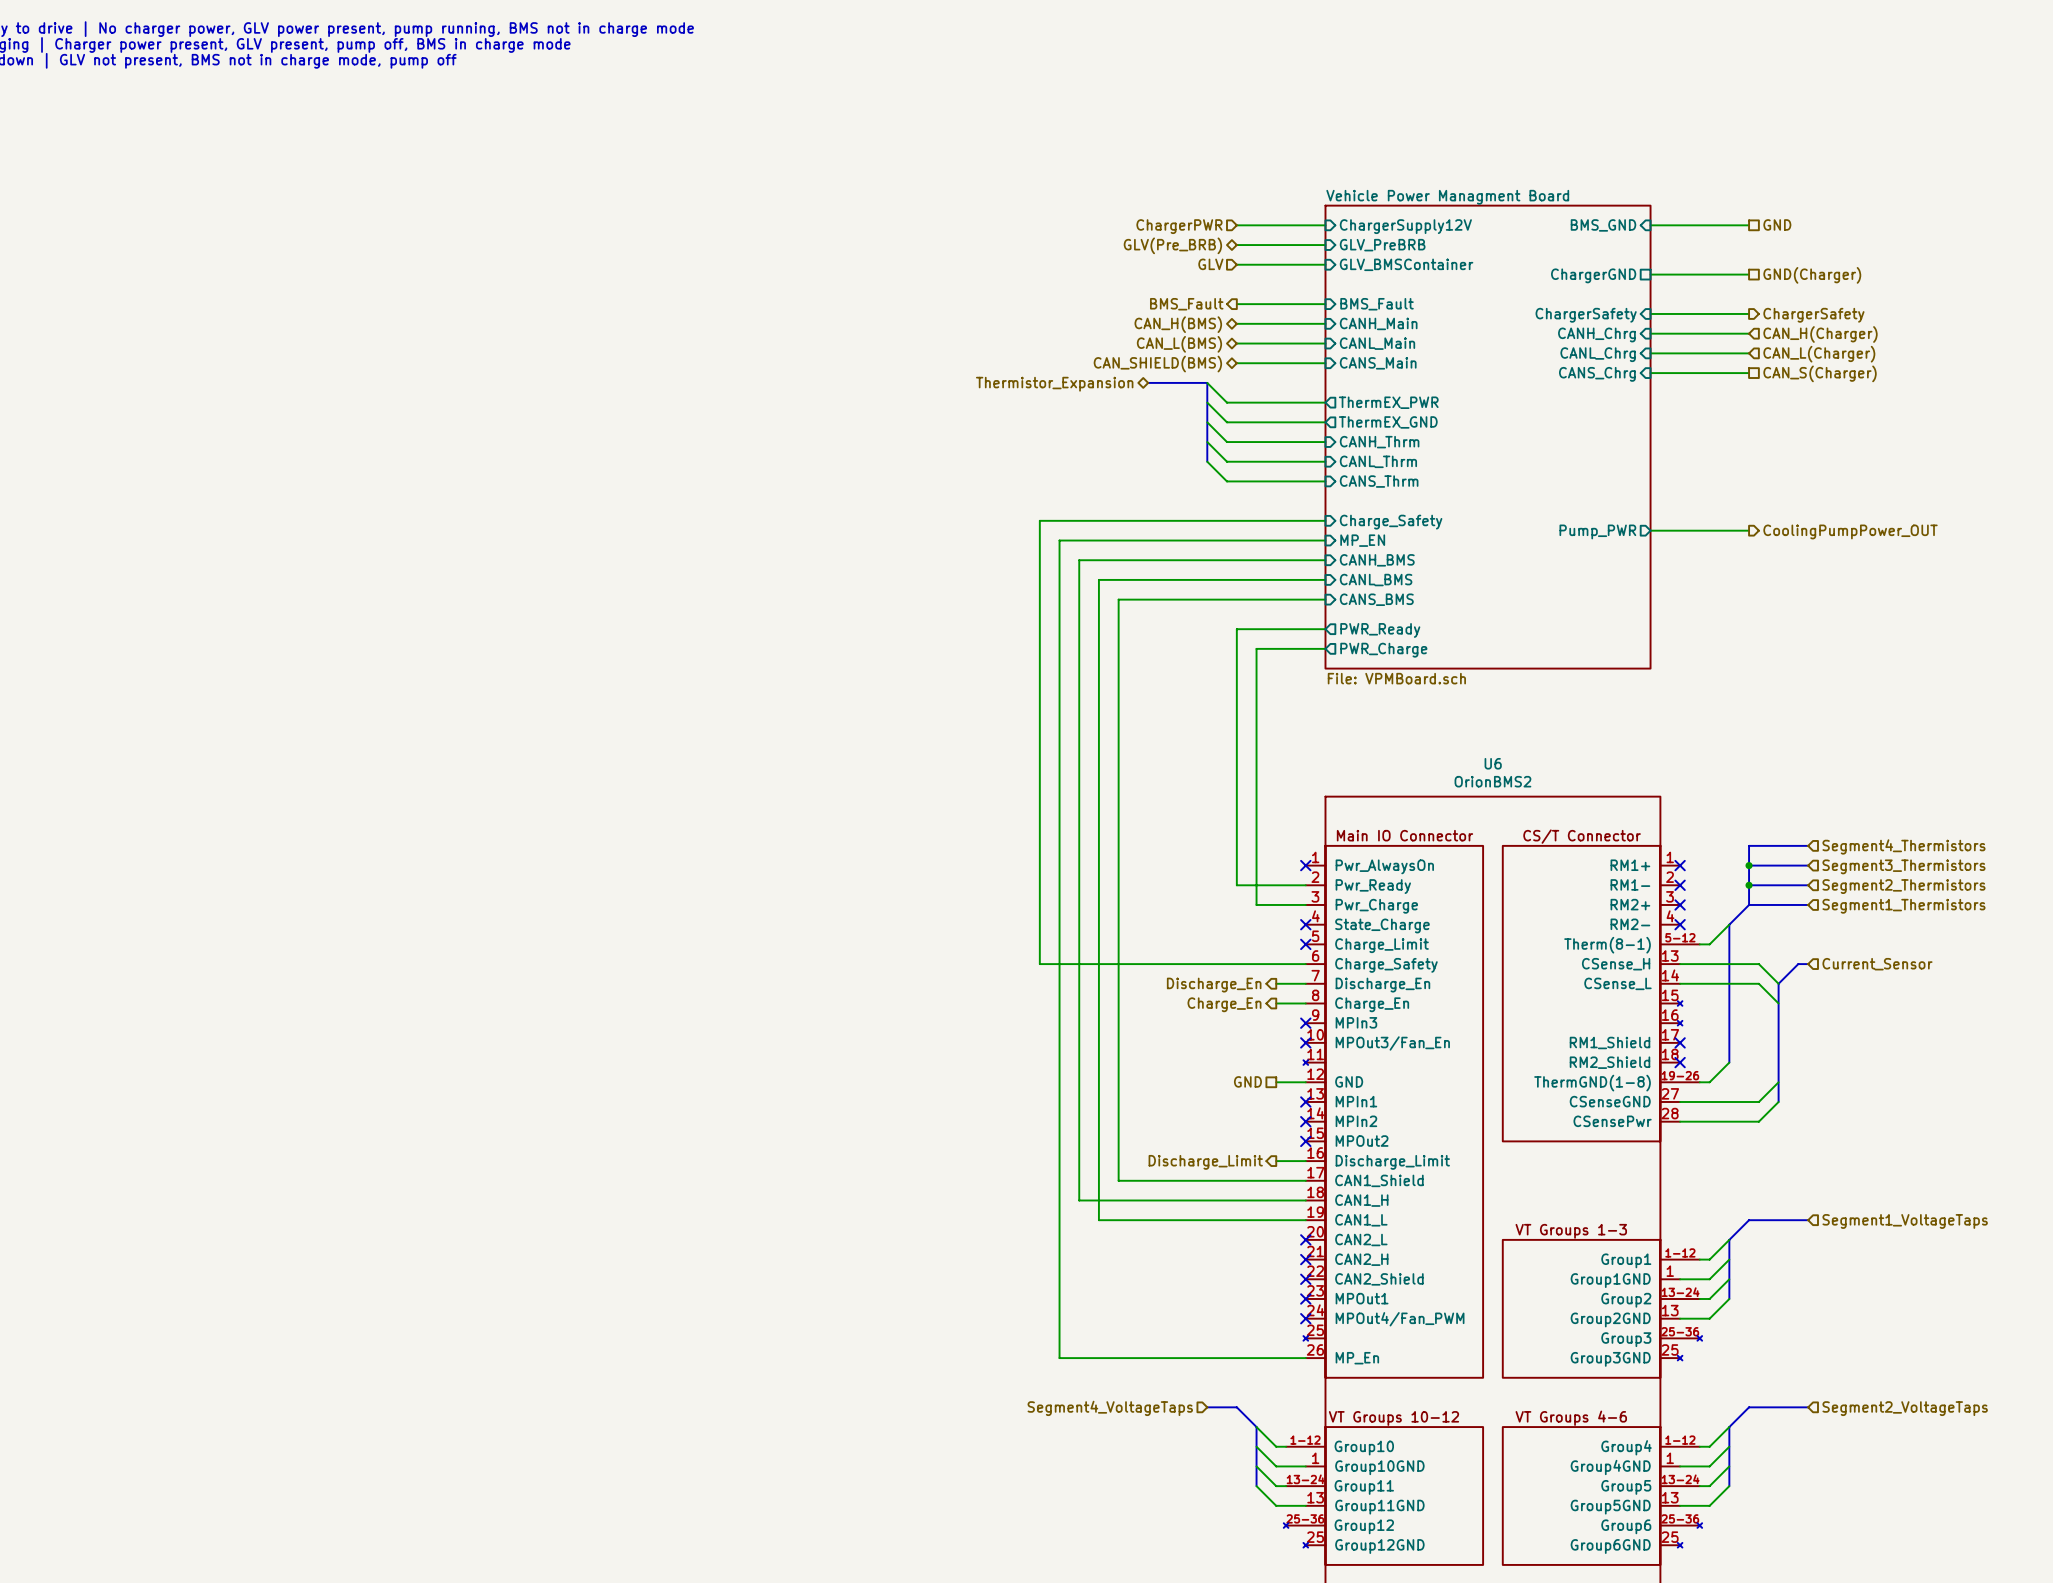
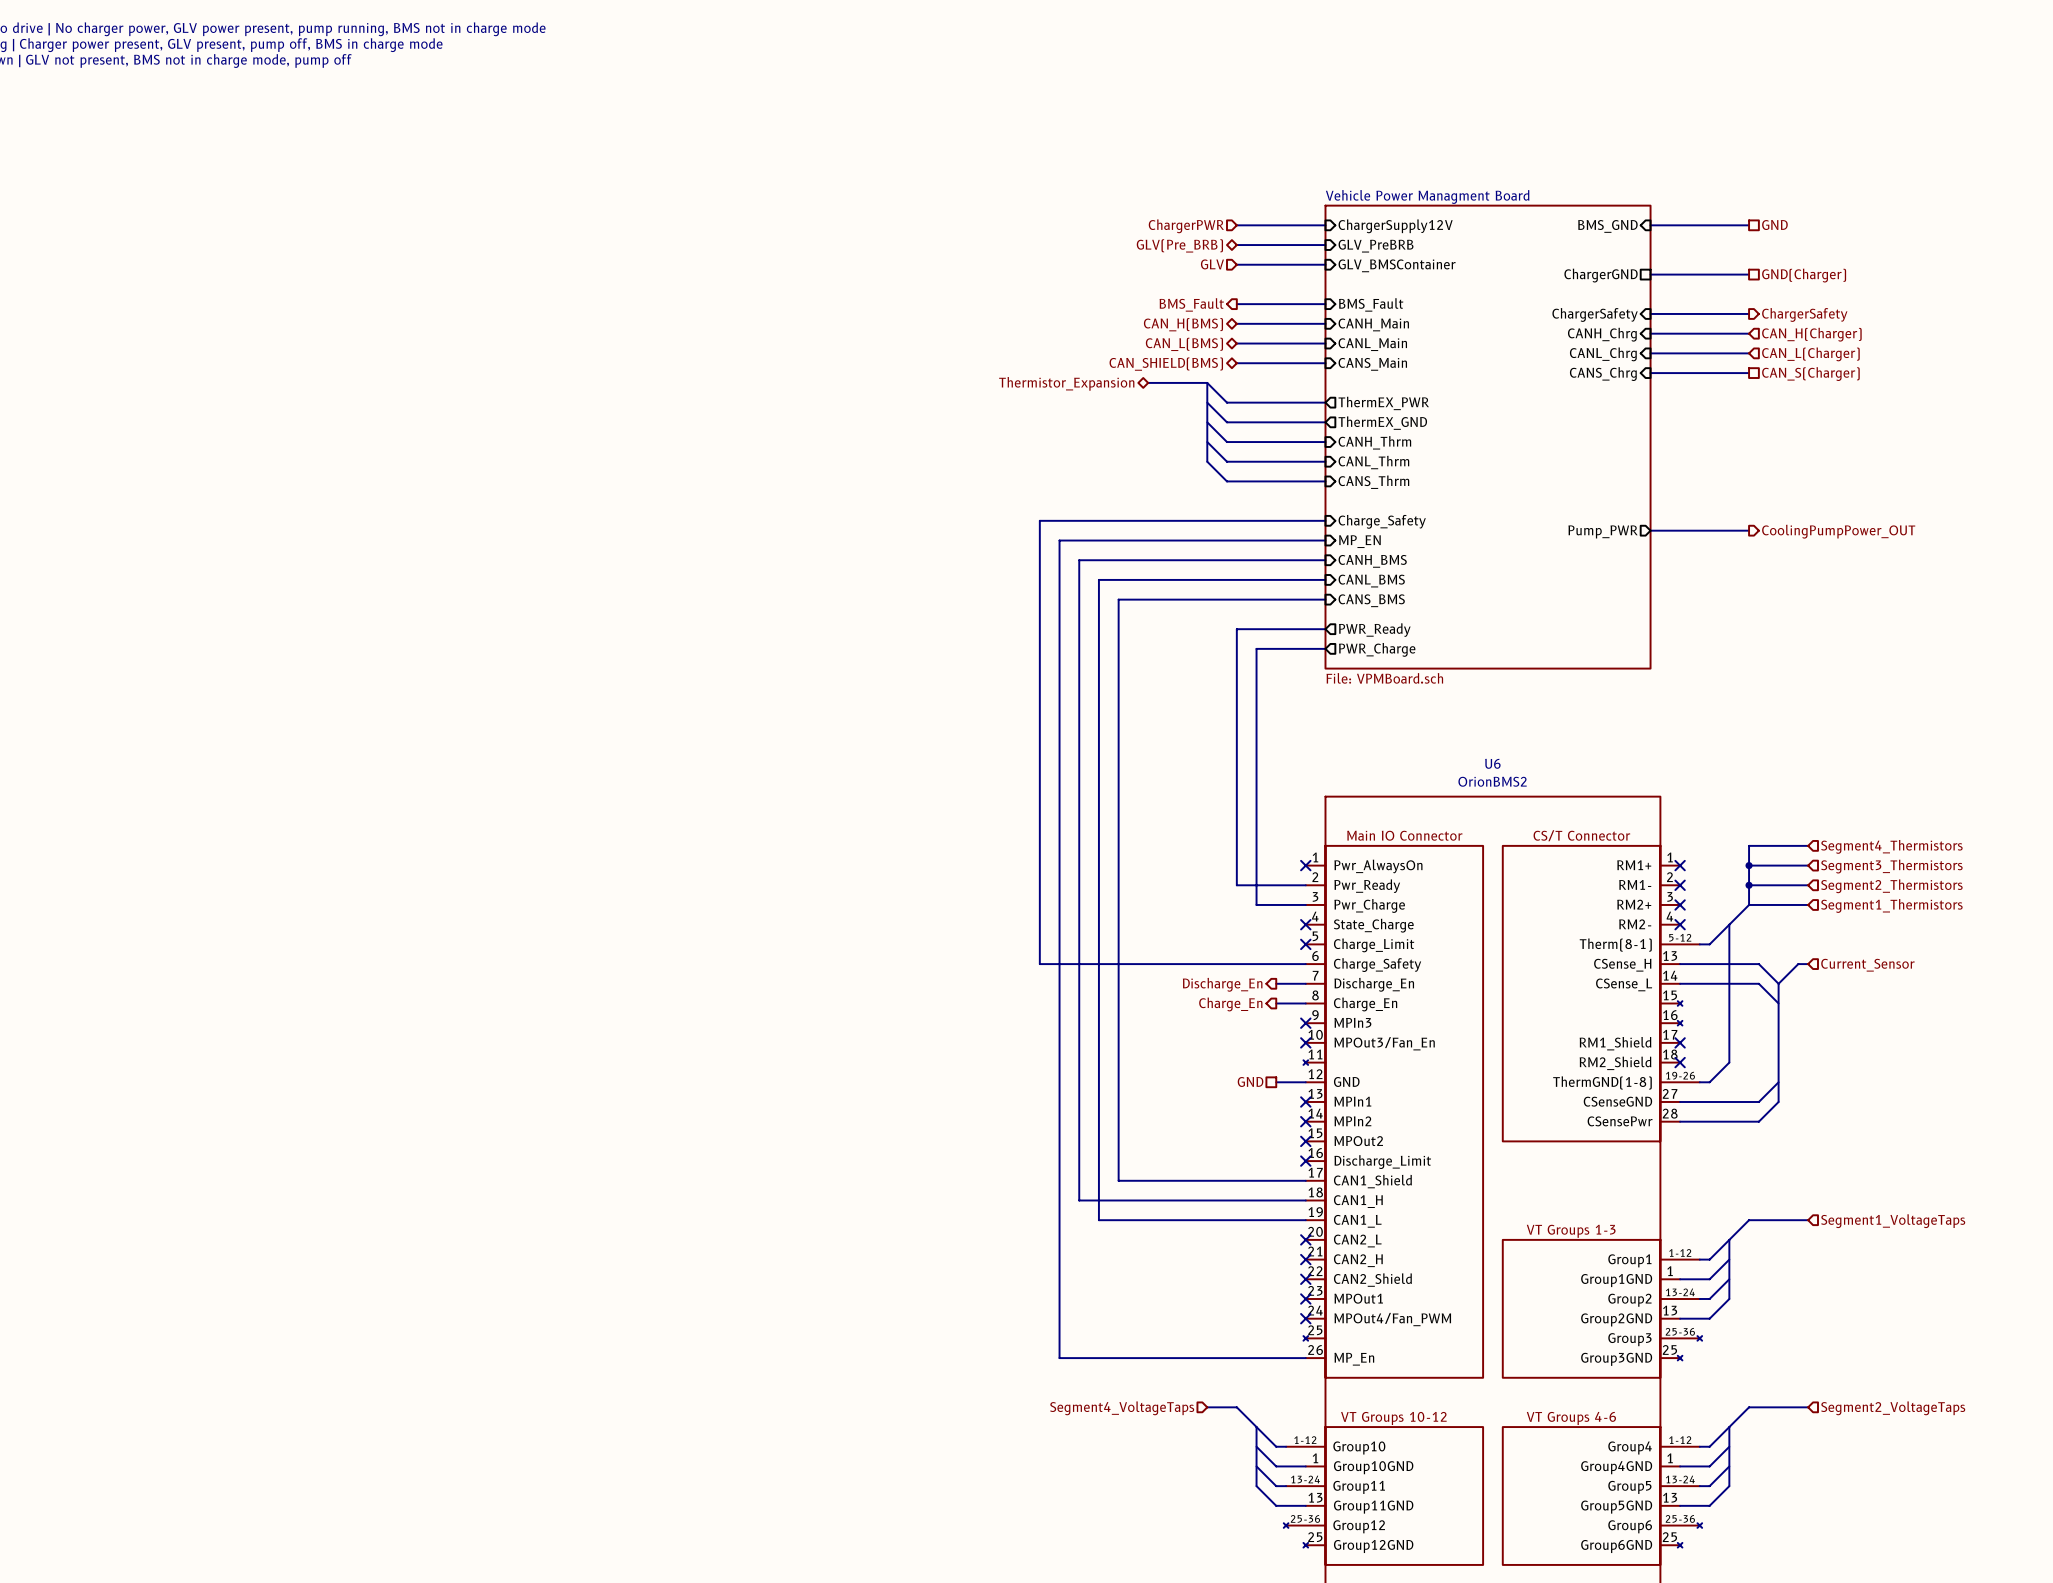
wire: (1276, 1161) (1305, 1161) -> none
no-connect mark: none -> (1305, 1161)
hierarchical label: Discharge_Limit (1205, 1162) -> none

